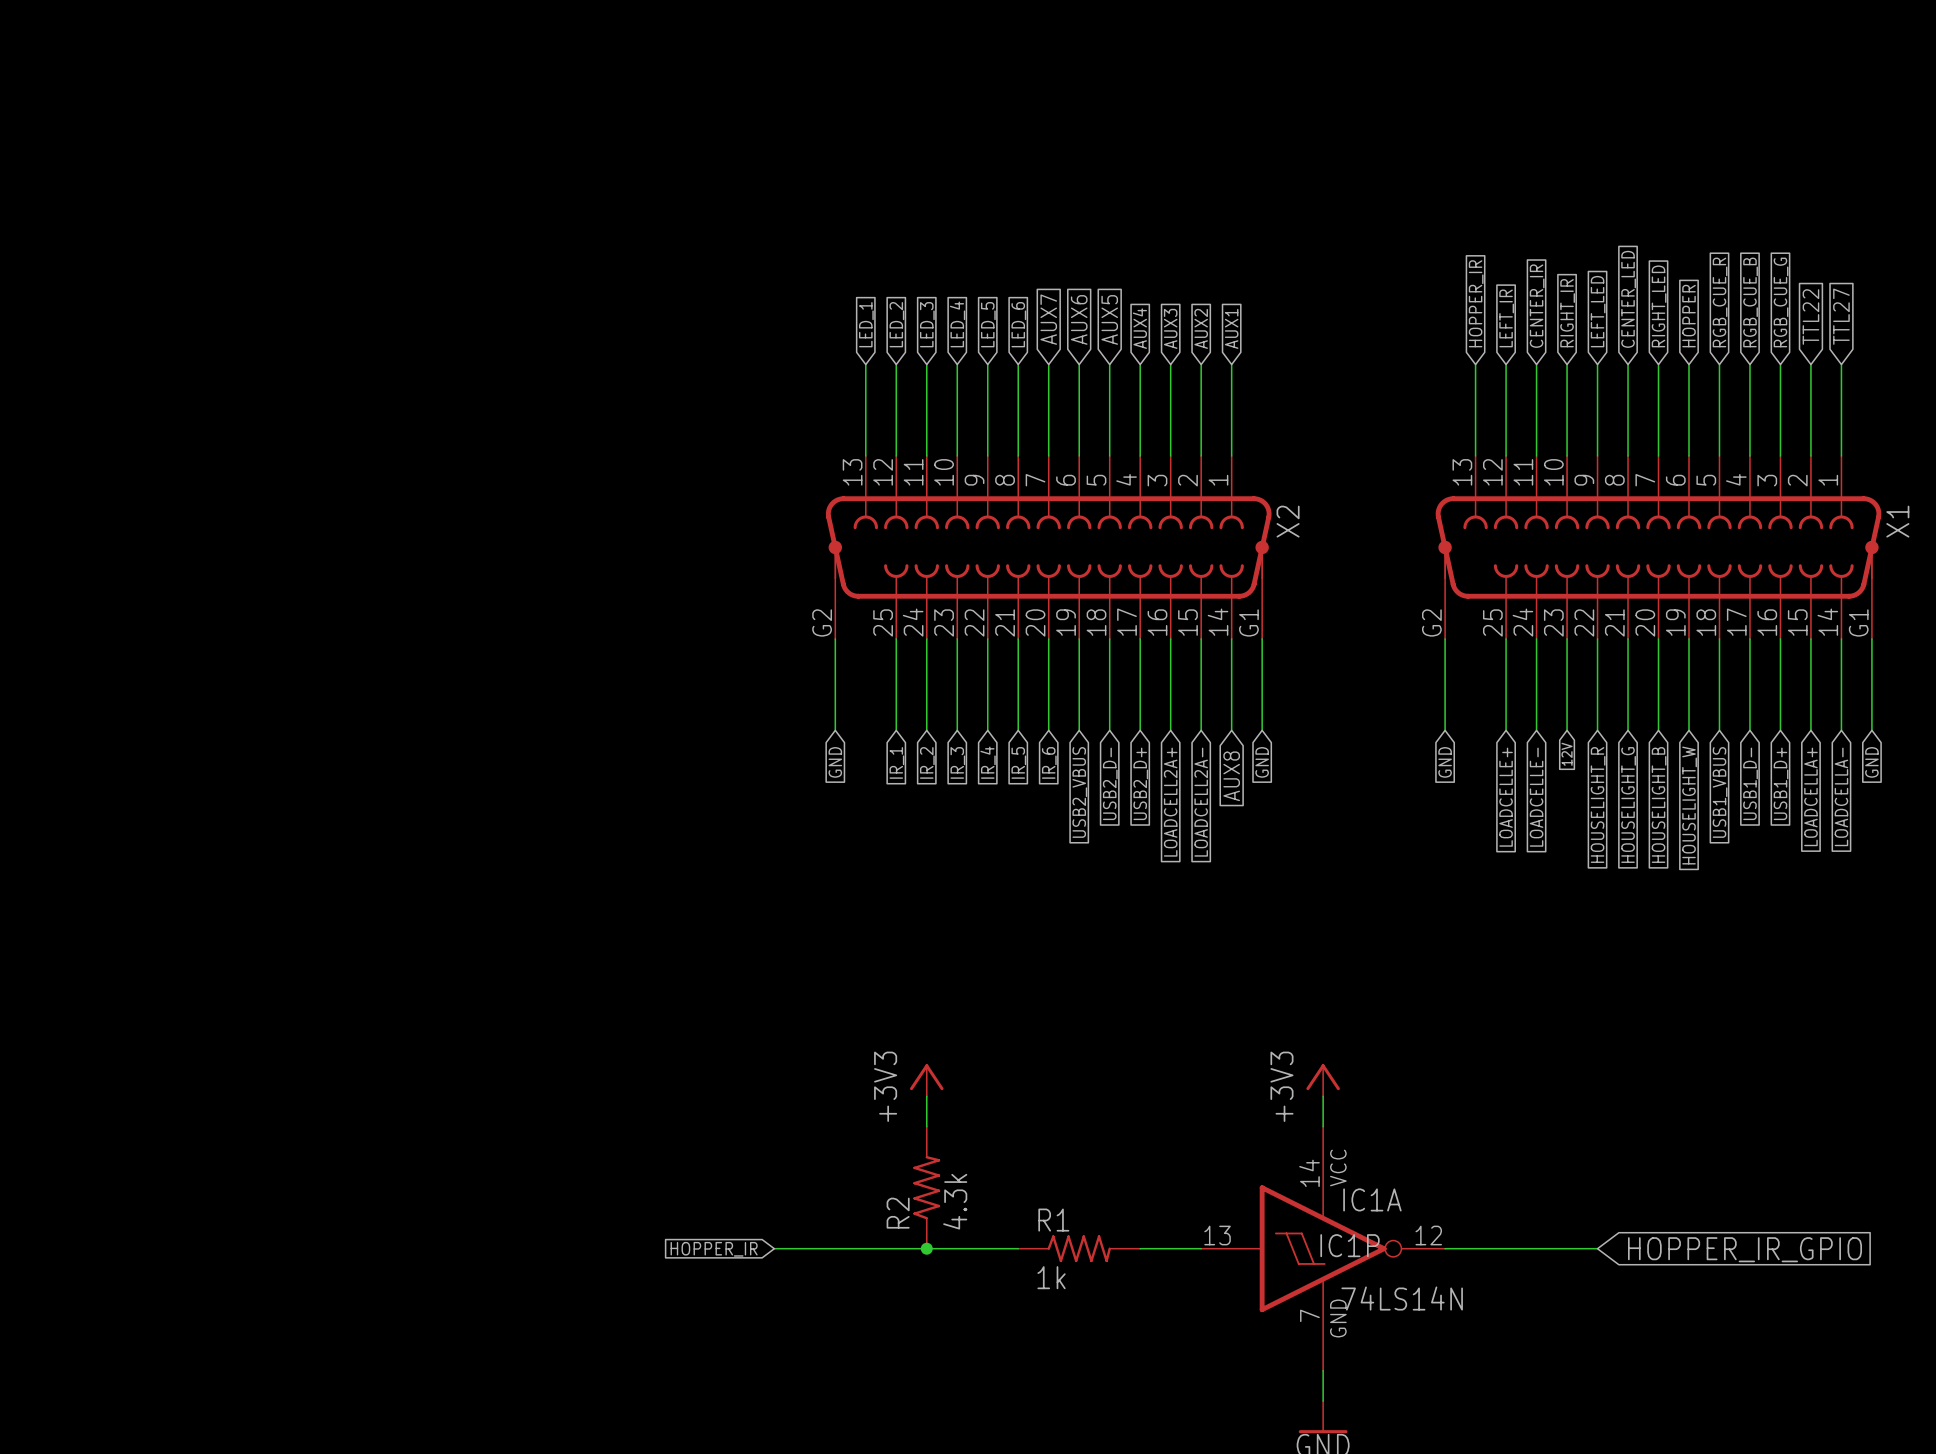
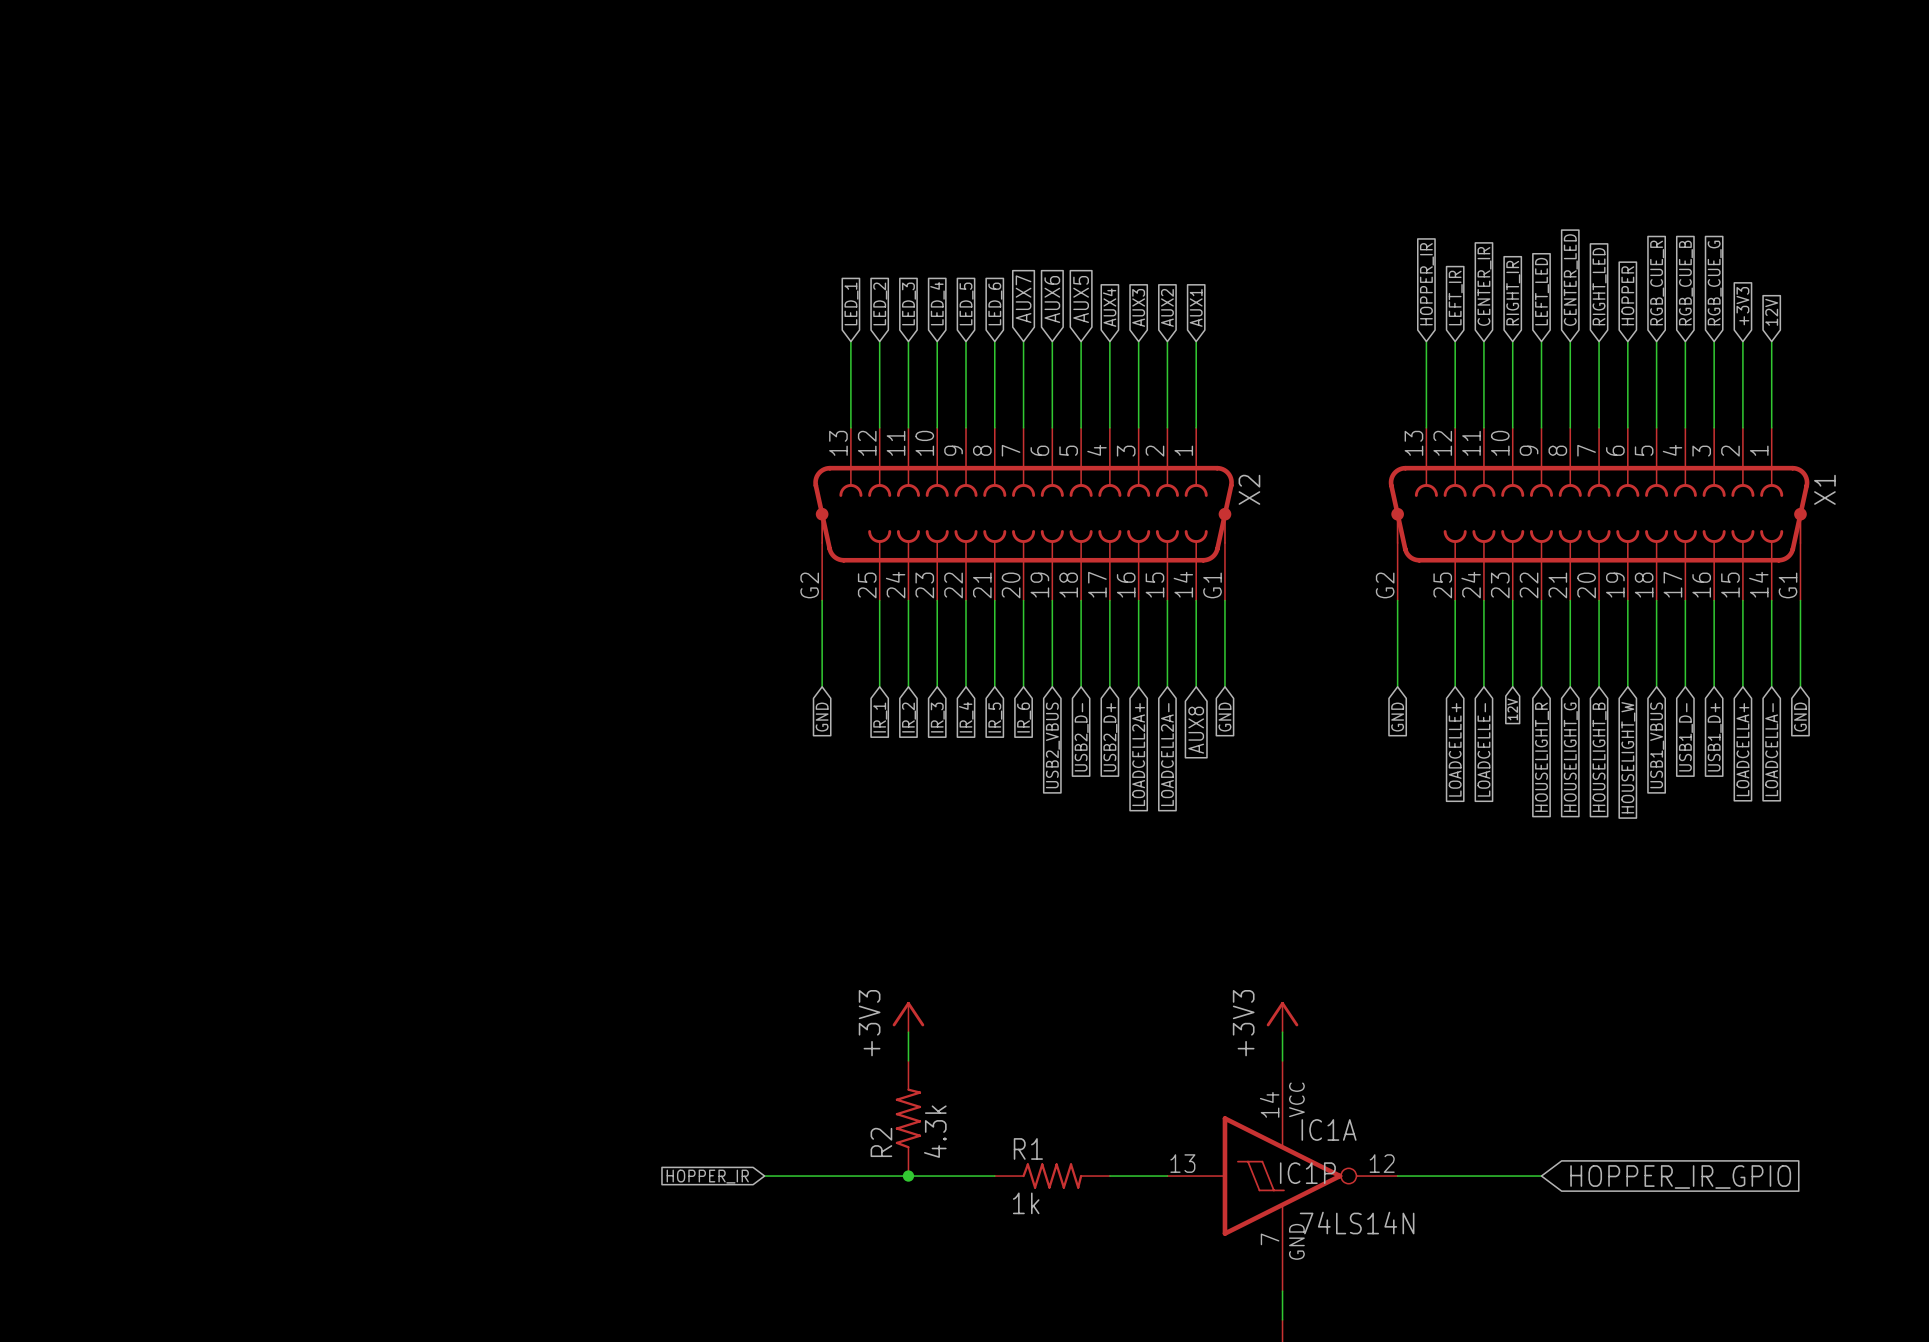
global label: TTL27 (1841, 316) -> 12V (1771, 312)
global label: TTL22 (1810, 317) -> +3V3 (1742, 306)

